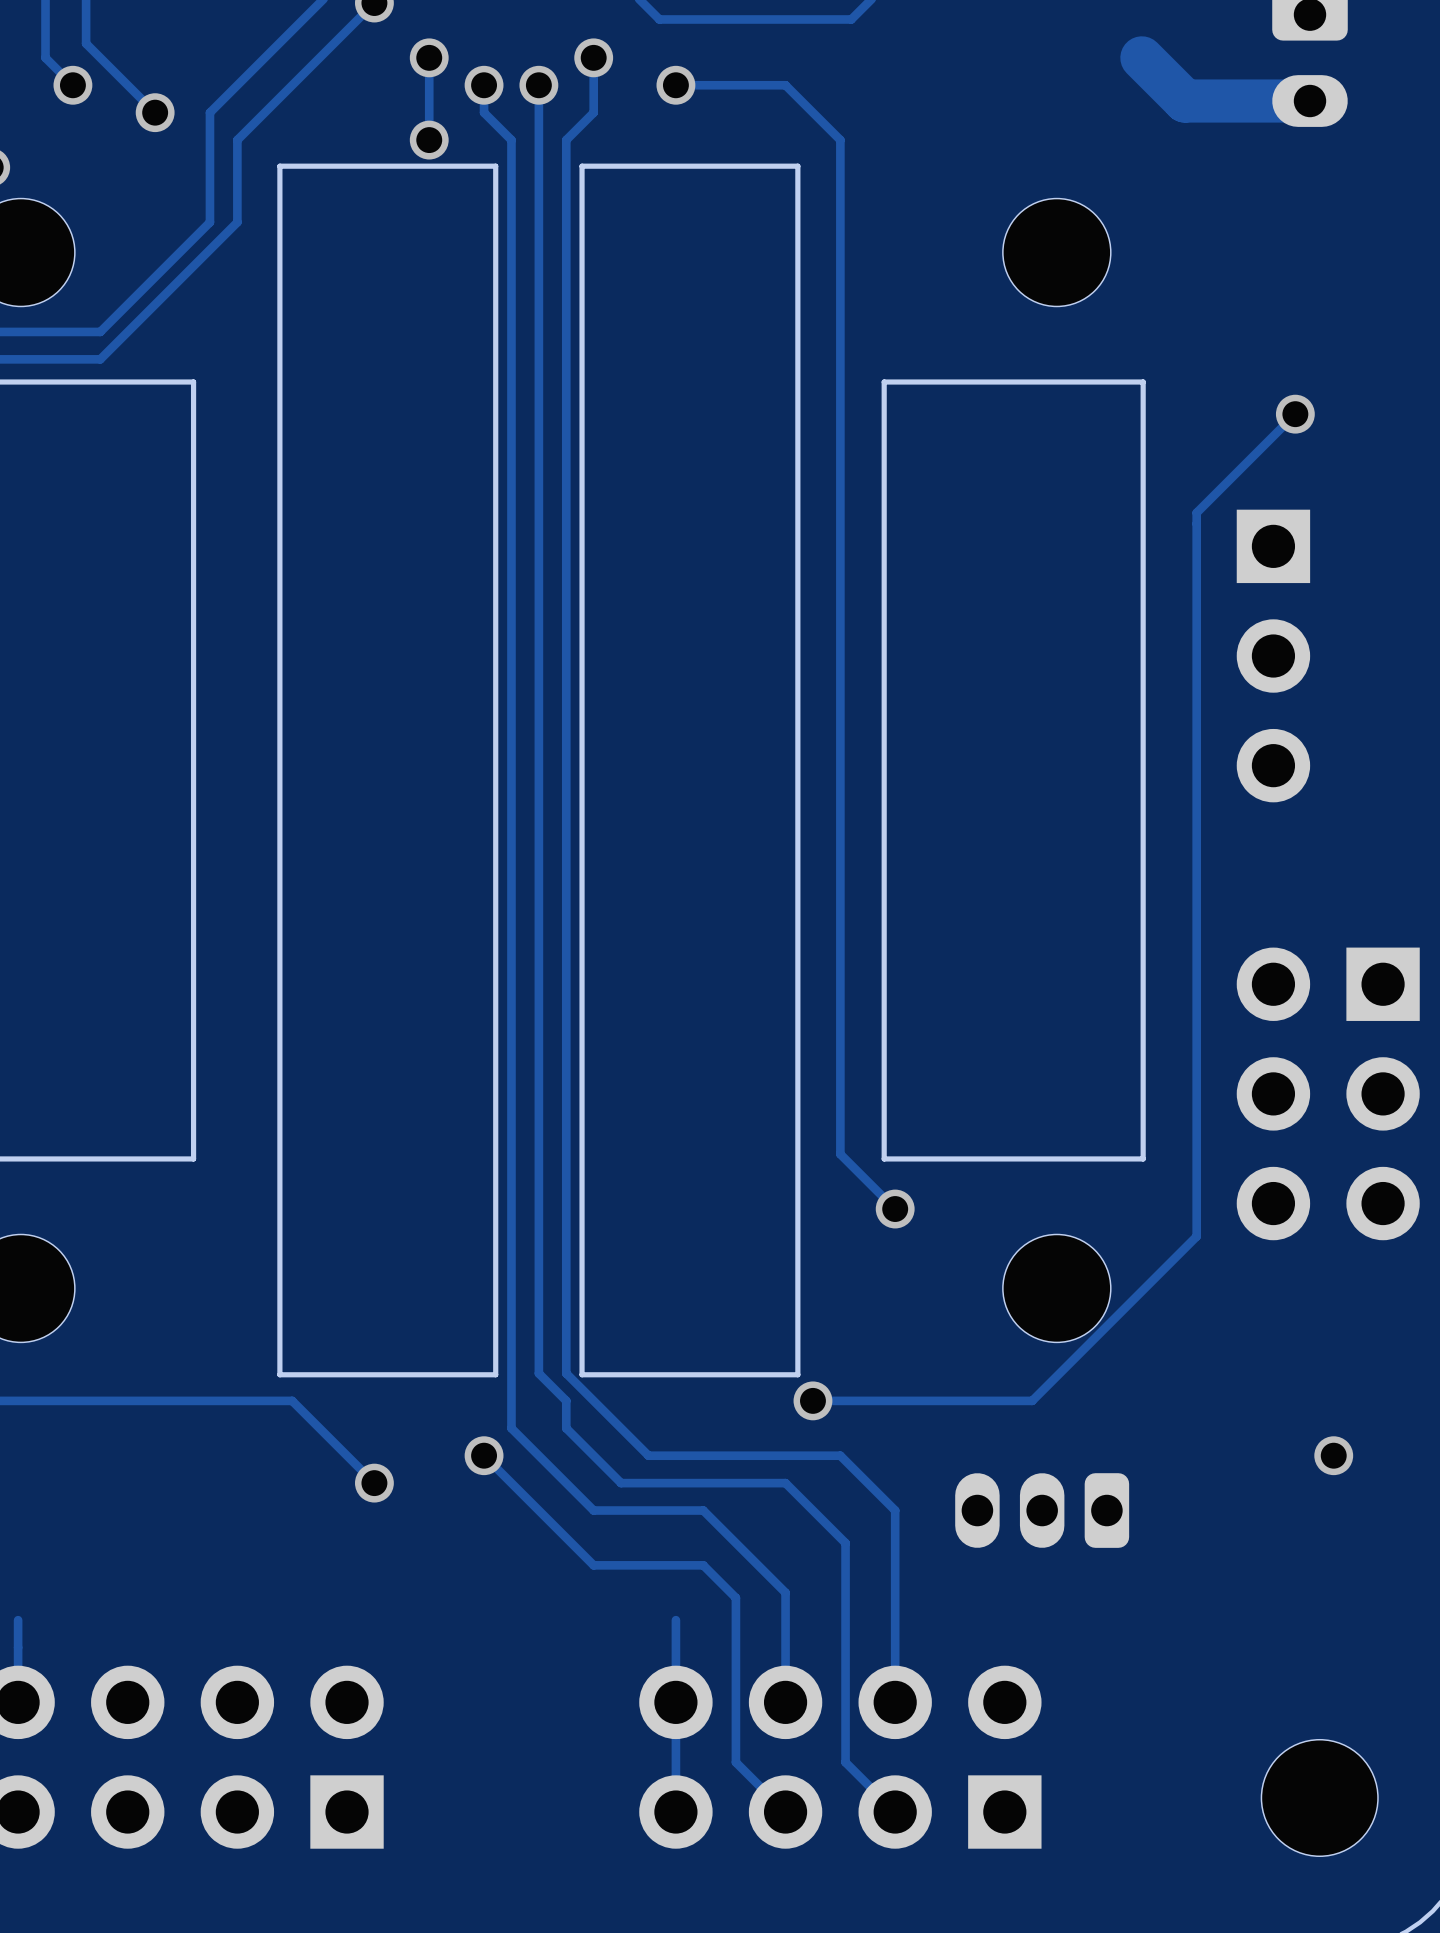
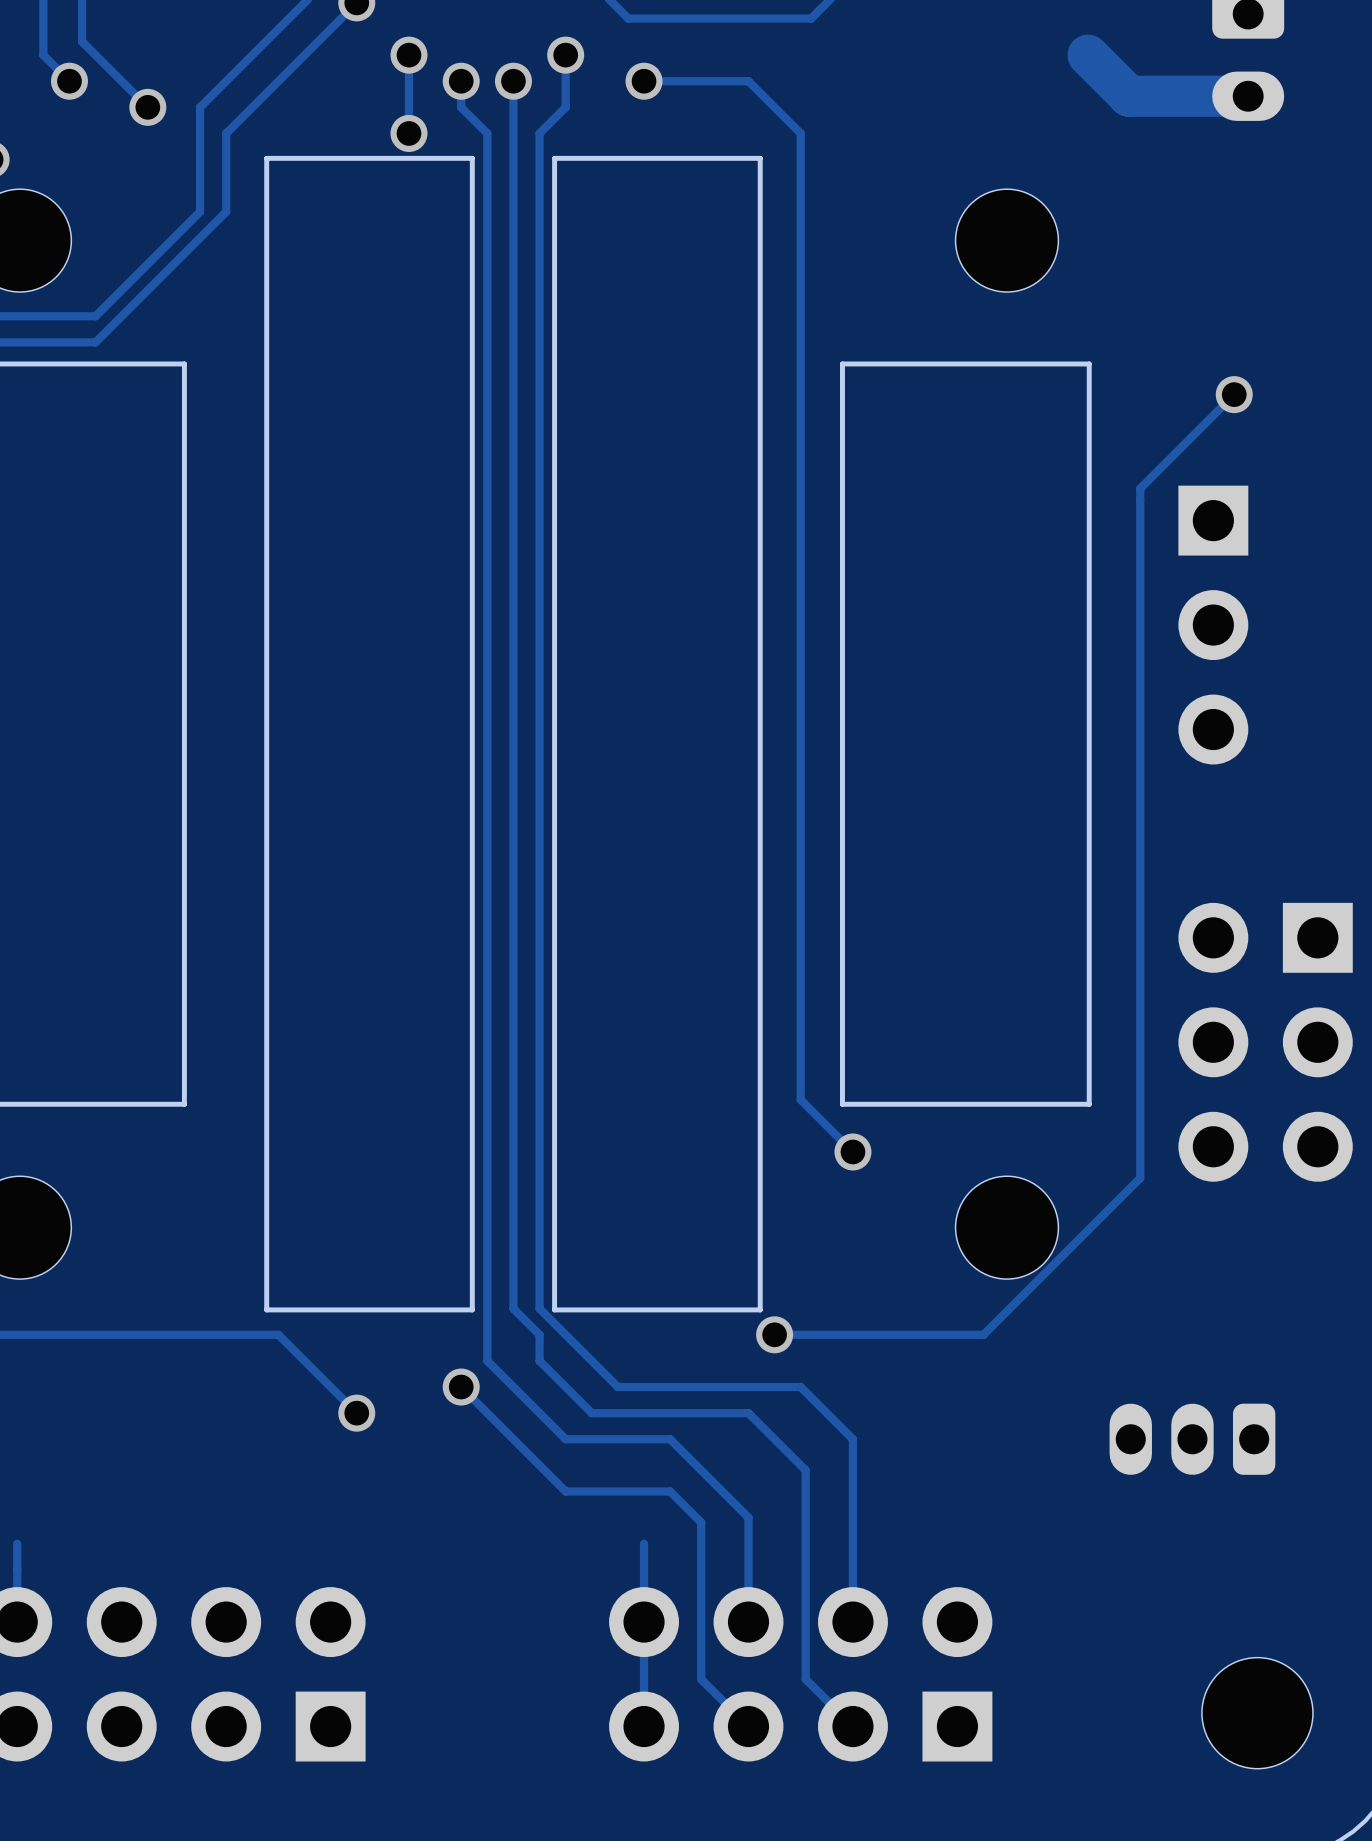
via: (1333, 1455) -> none
part position: (1042, 1510) -> (1192, 1439)

